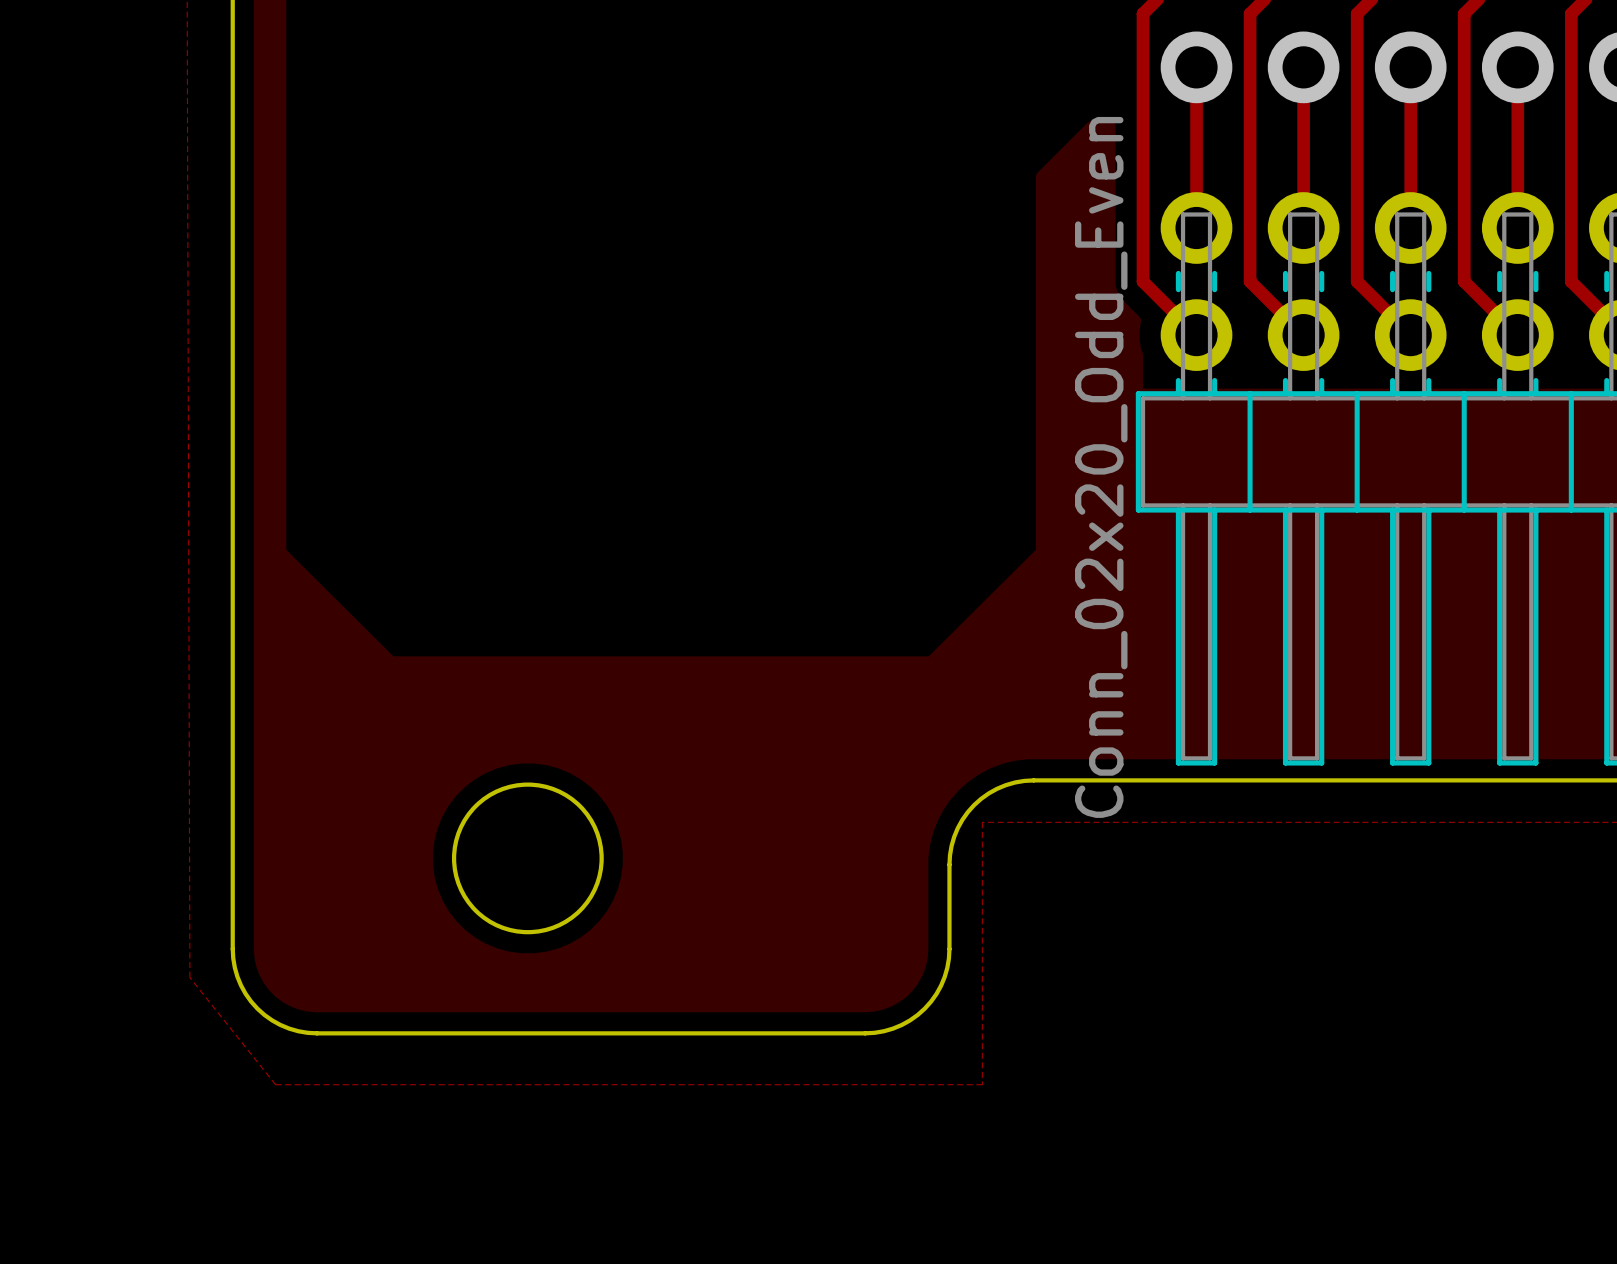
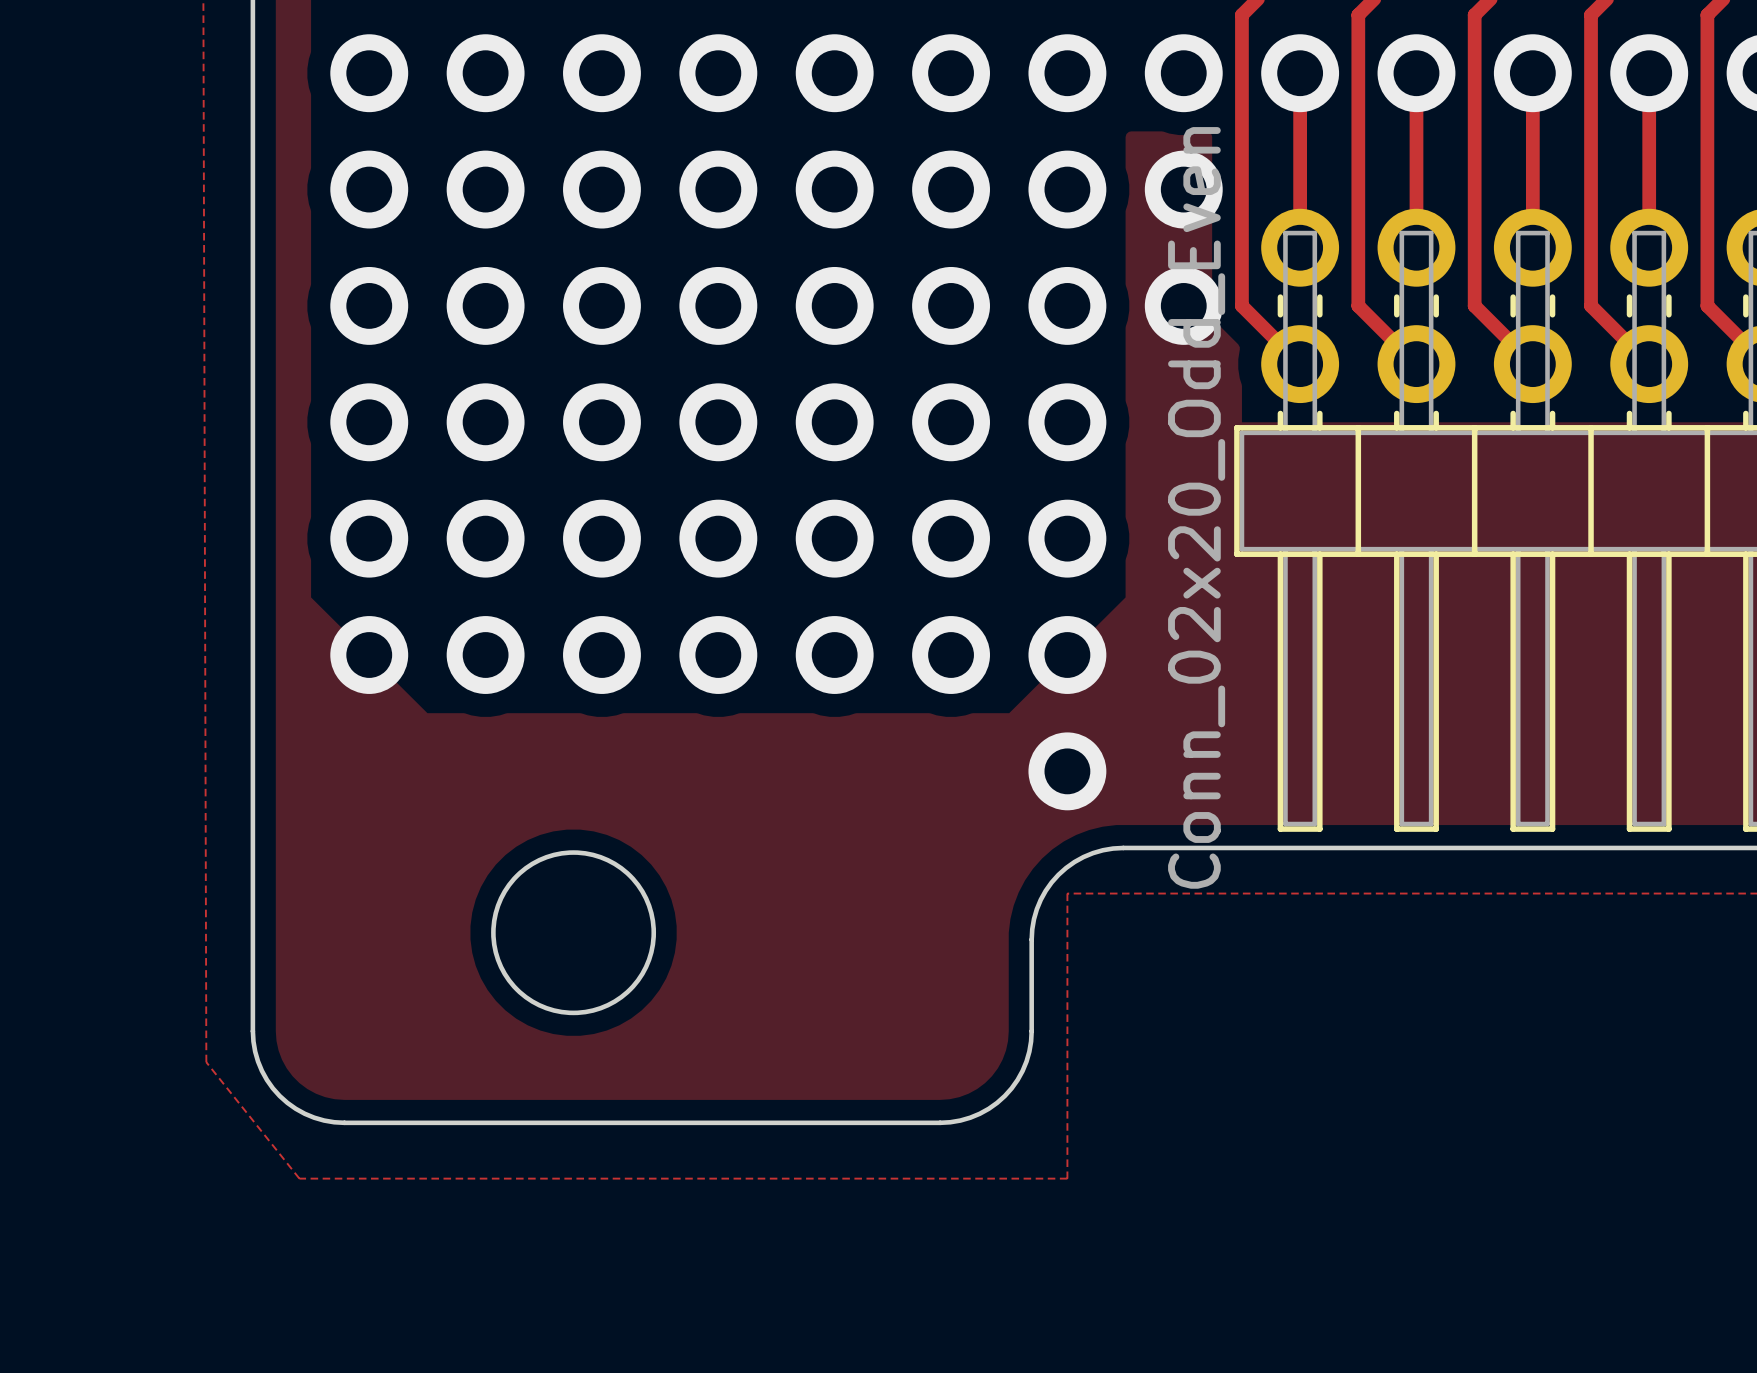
via: none -> (369, 73)
via: none -> (485, 73)
via: none -> (601, 73)
via: none -> (718, 73)
via: none -> (834, 73)
via: none -> (951, 73)
via: none -> (1067, 73)
via: none -> (1183, 73)
via: none -> (369, 189)
via: none -> (485, 189)
via: none -> (601, 189)
via: none -> (718, 189)
via: none -> (834, 189)
via: none -> (951, 189)
via: none -> (1067, 189)
via: none -> (1183, 189)
via: none -> (369, 305)
via: none -> (485, 305)
via: none -> (601, 305)
via: none -> (718, 305)
via: none -> (834, 305)
via: none -> (951, 305)
via: none -> (1067, 305)
via: none -> (1183, 305)
via: none -> (369, 422)
via: none -> (485, 422)
via: none -> (601, 422)
via: none -> (718, 422)
via: none -> (834, 422)
via: none -> (951, 422)
via: none -> (1067, 422)
via: none -> (369, 538)
via: none -> (485, 538)
via: none -> (601, 538)
via: none -> (718, 538)
via: none -> (834, 538)
via: none -> (951, 538)
via: none -> (1067, 538)
via: none -> (369, 655)
via: none -> (485, 655)
via: none -> (601, 655)
via: none -> (718, 655)
via: none -> (834, 655)
via: none -> (951, 655)
via: none -> (1067, 655)
via: none -> (1067, 771)

